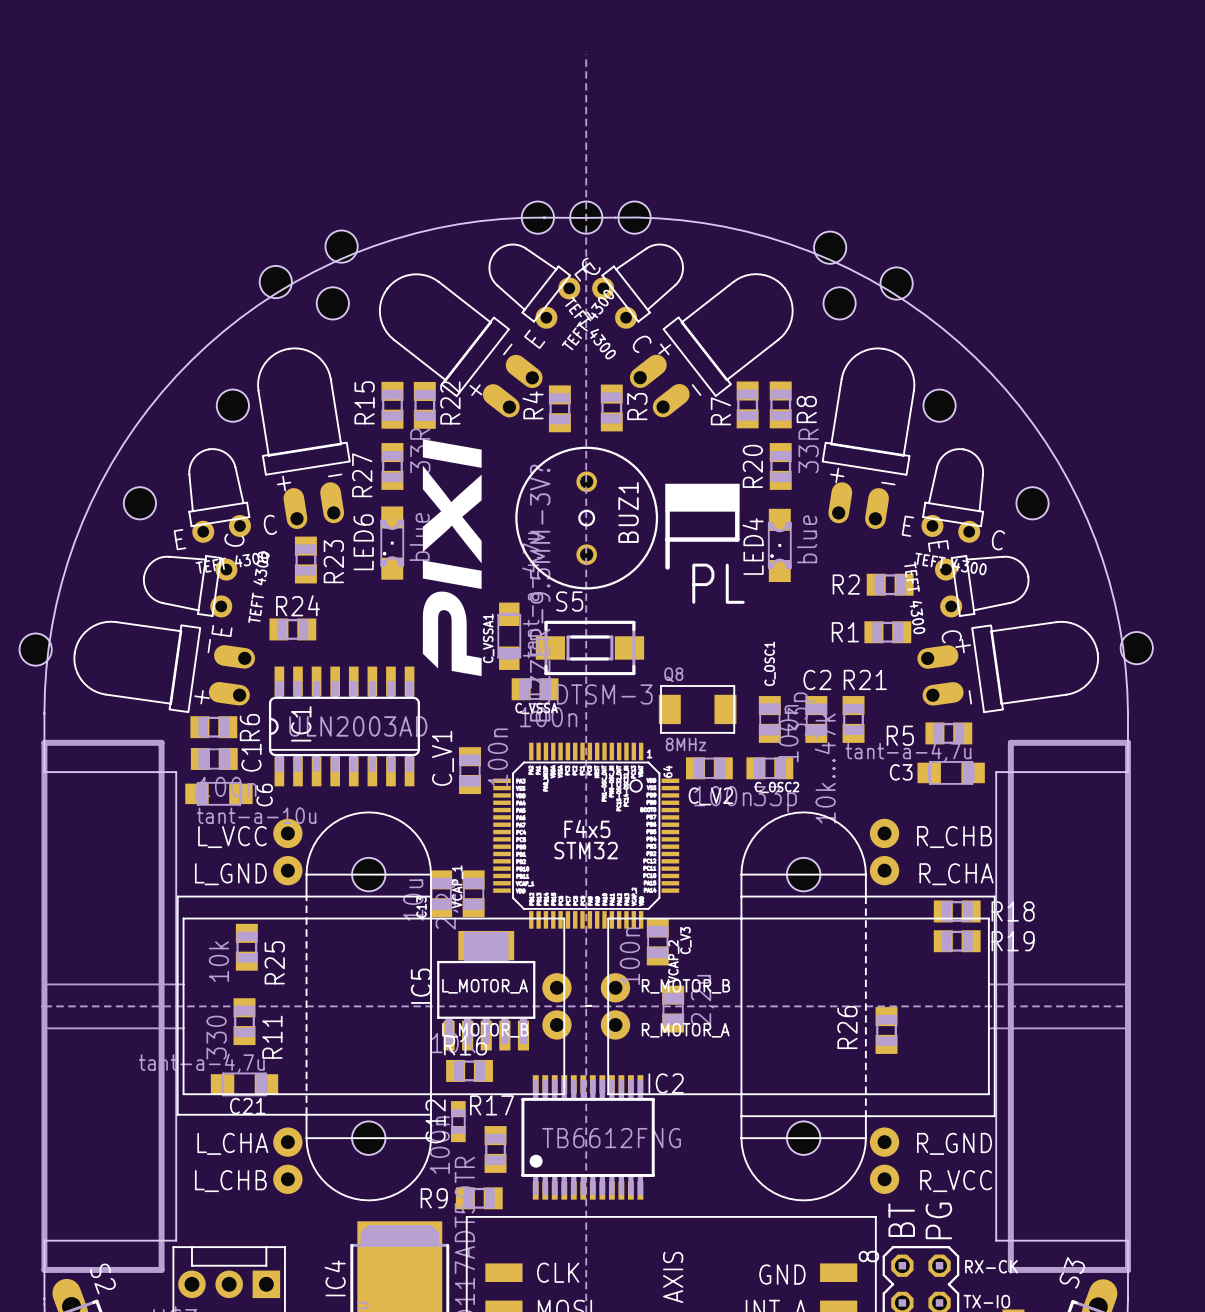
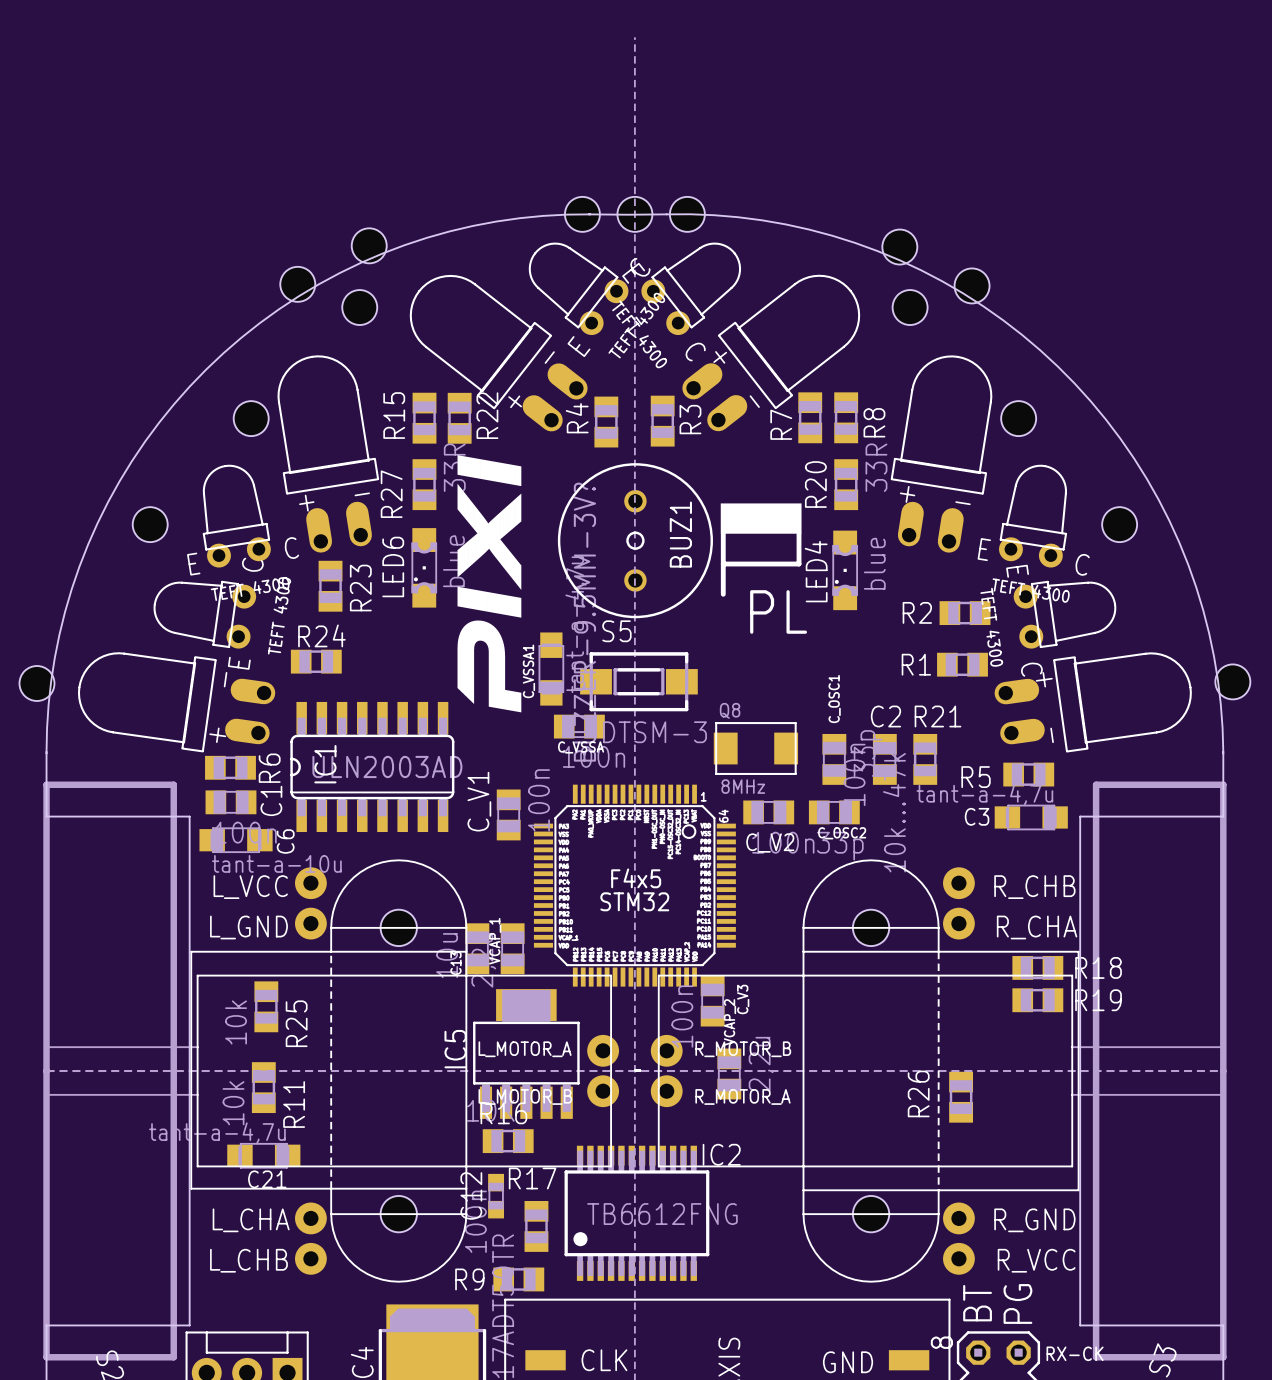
R11 value: 330 (216, 1037) -> 10k (233, 1103)

